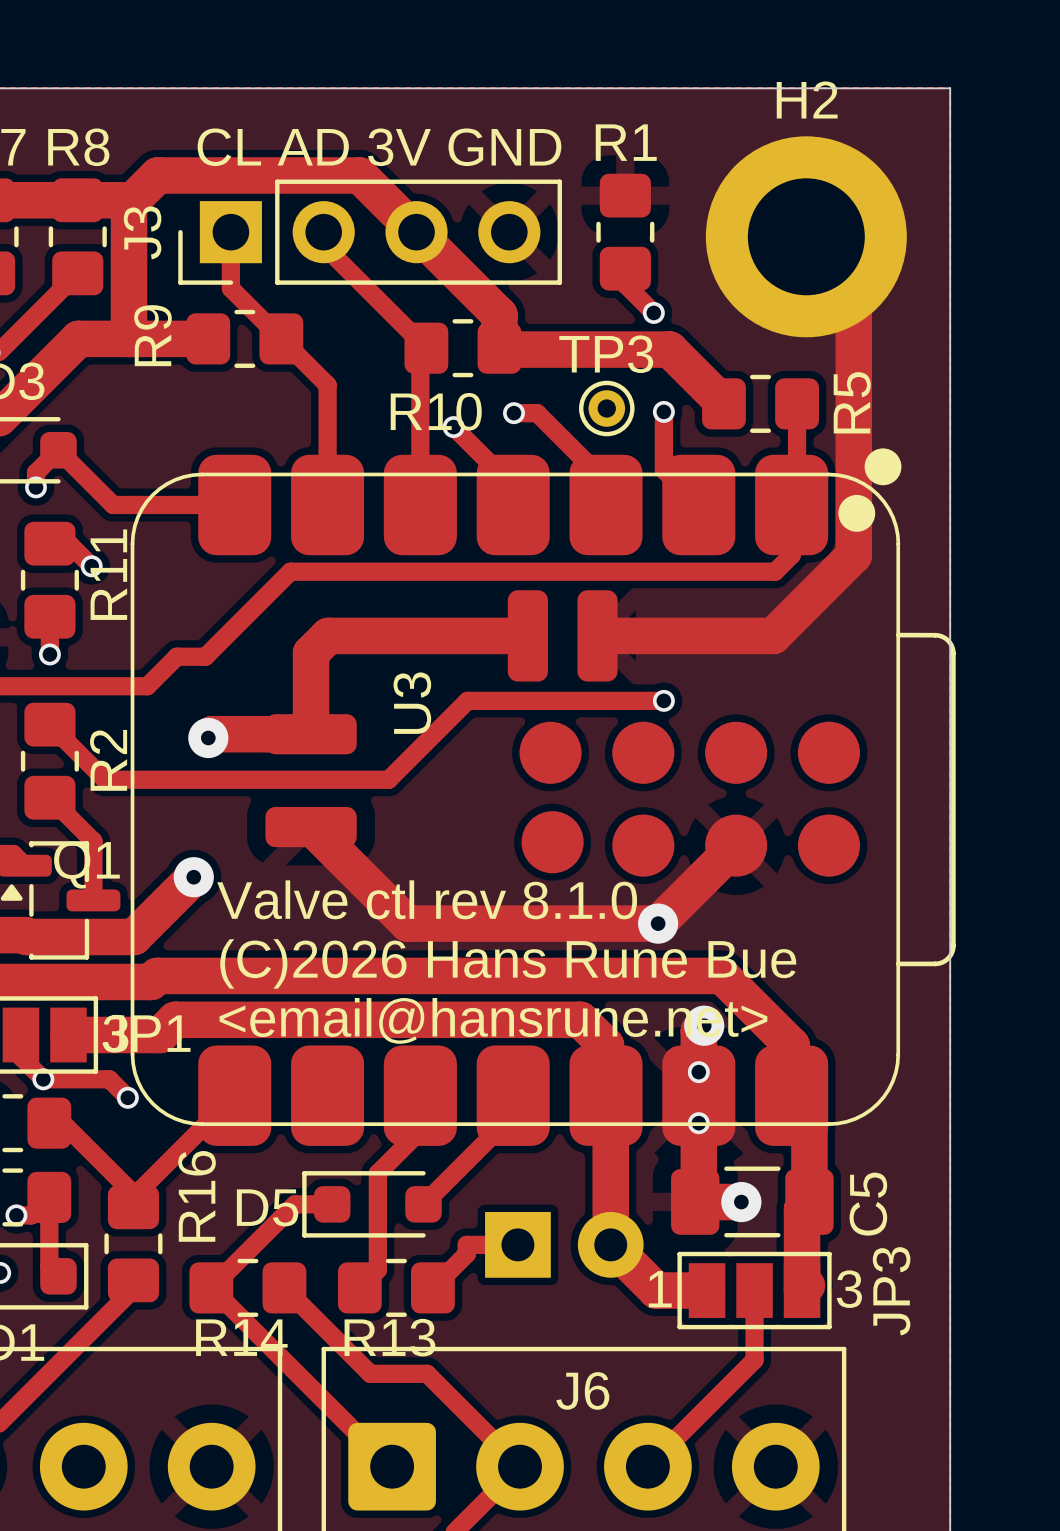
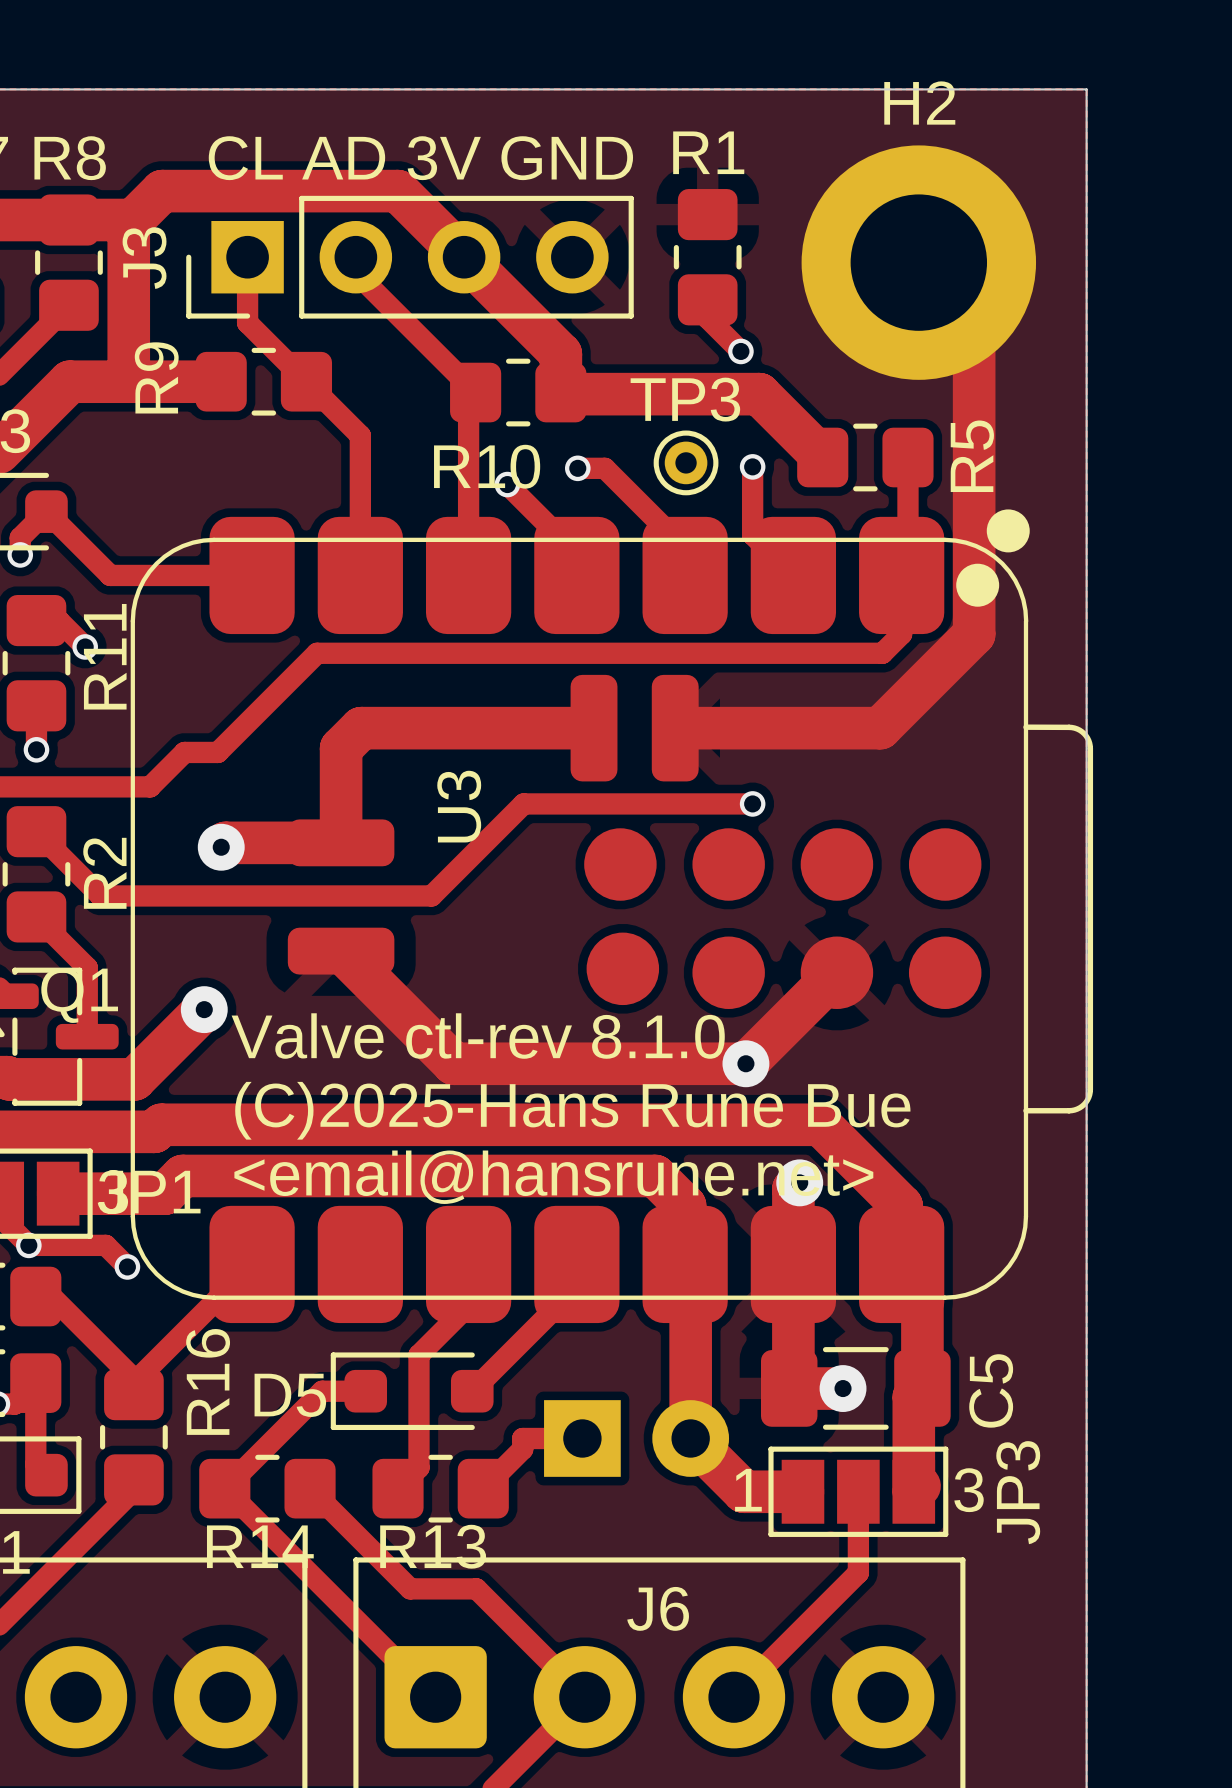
text: Valve ctl rev 8.1.0 (427, 899) -> Valve ctl-rev 8.1.0 (478, 1036)
text: (C)2026 Hans Rune Bue (508, 963) -> (C)2025-Hans Rune Bue (572, 1110)
via: (698, 1072) -> none
via: (698, 1123) -> none

